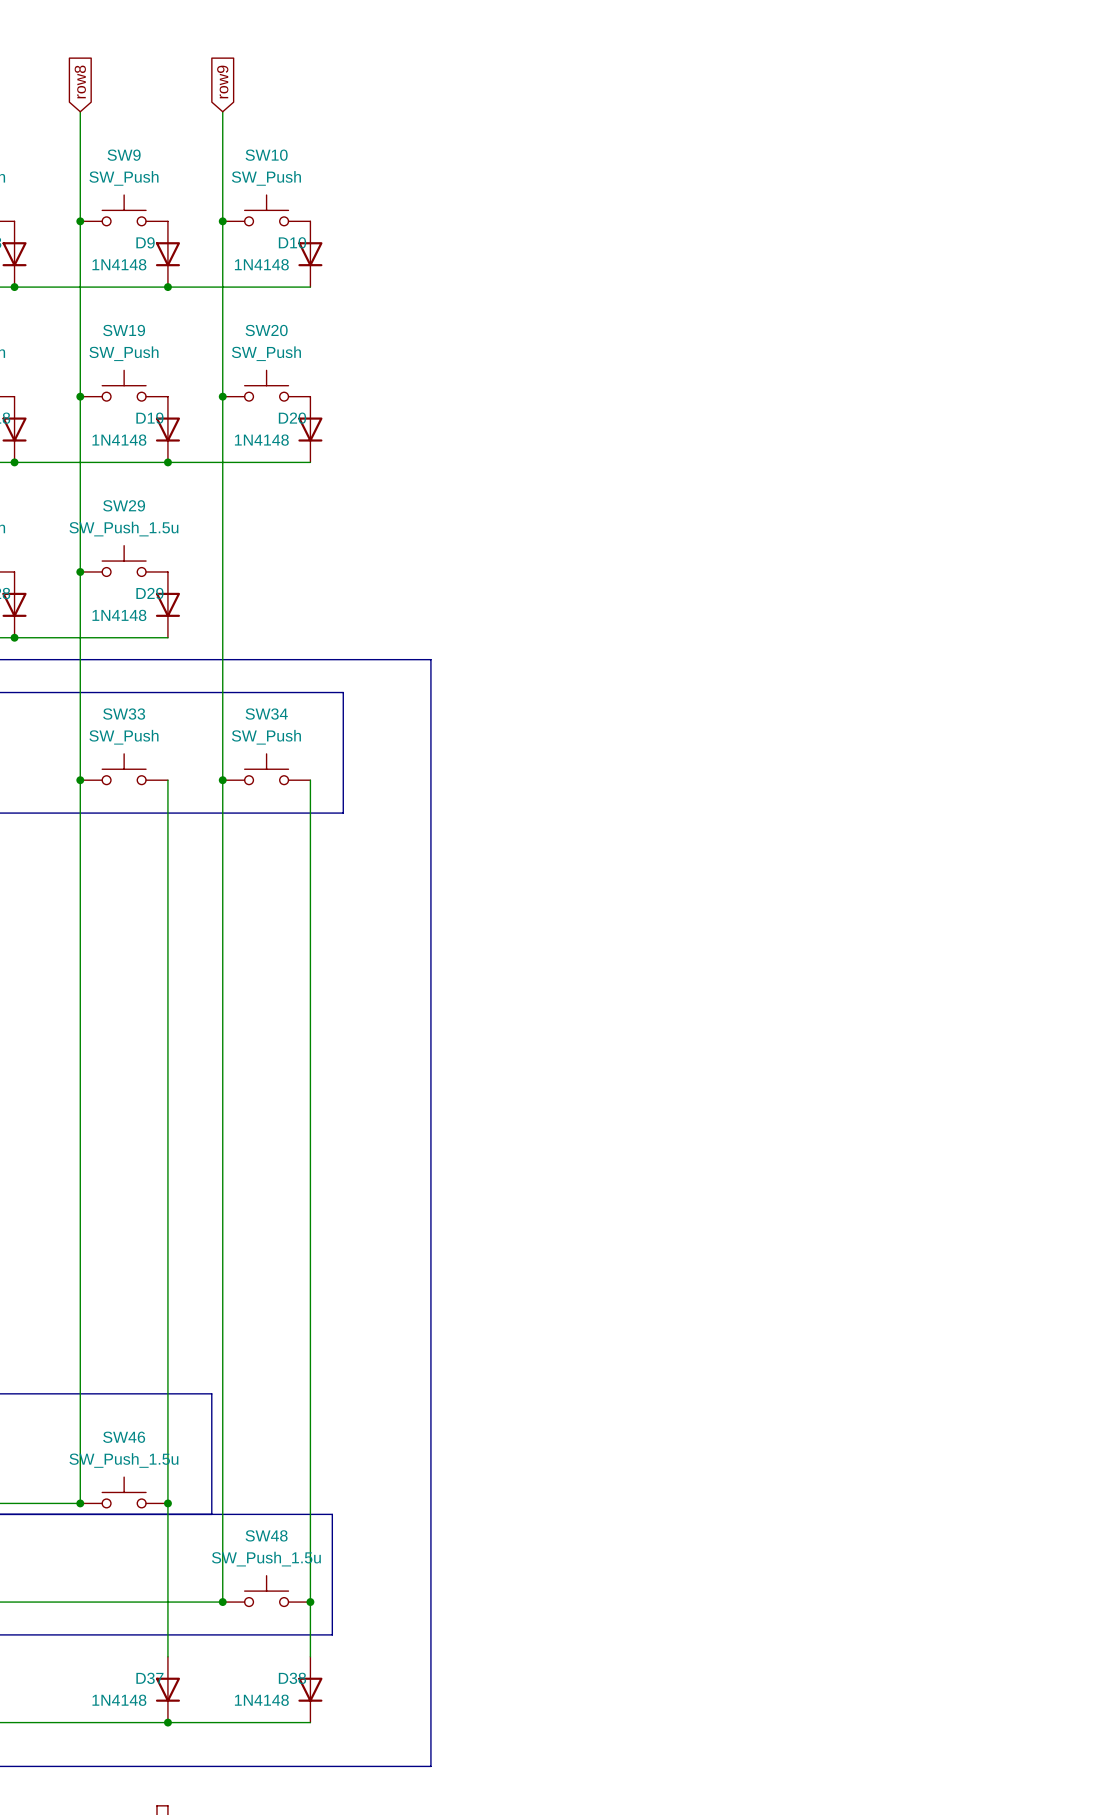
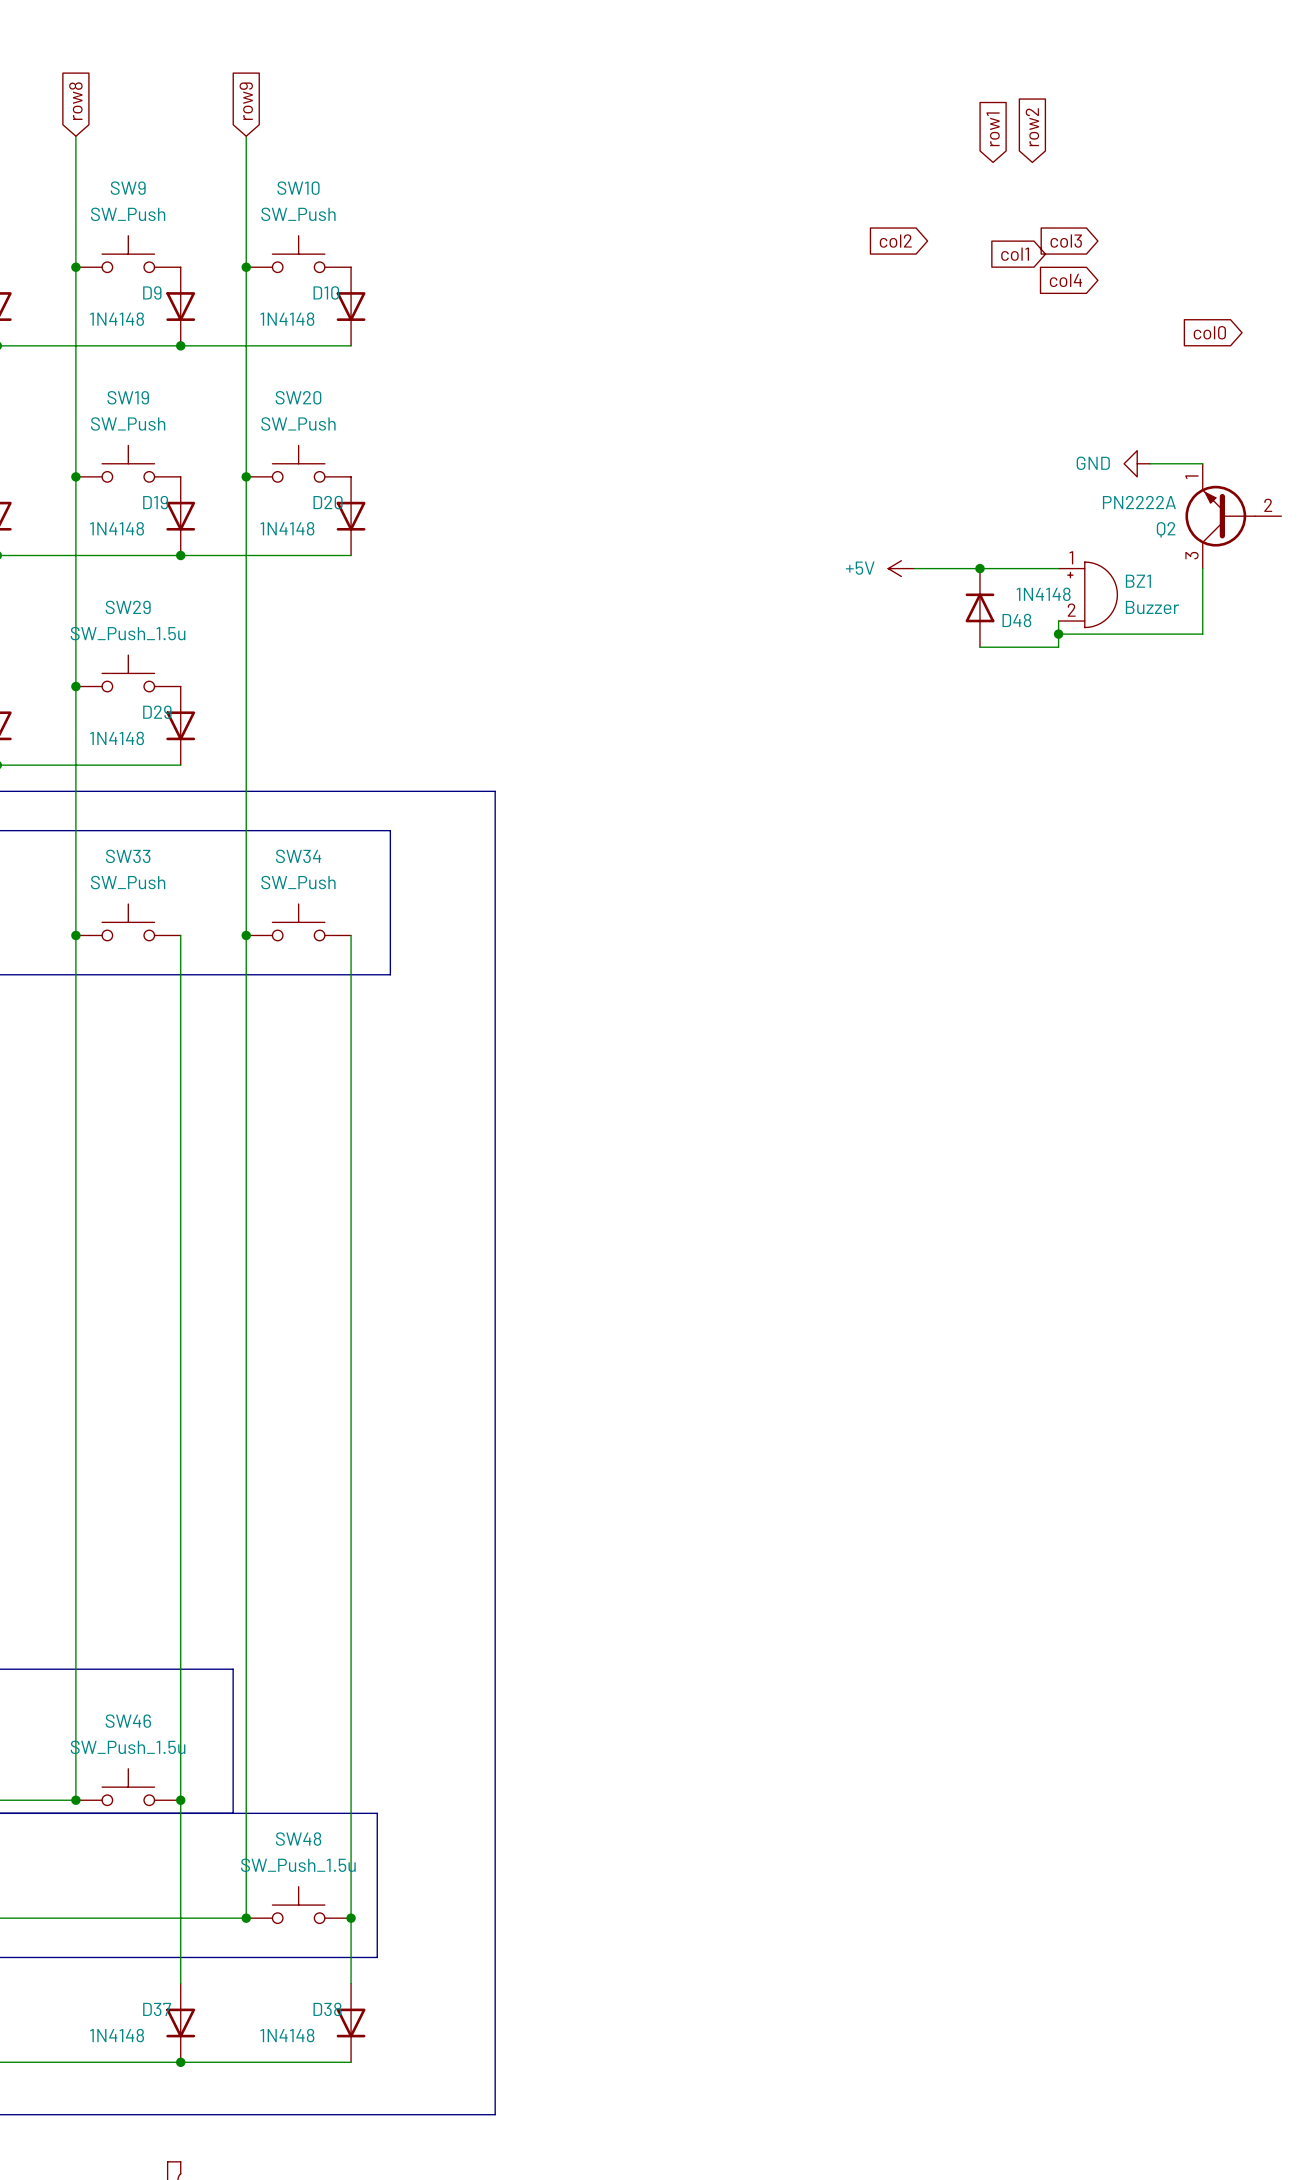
global label: none -> row1 (993, 129)
global label: none -> row2 (1032, 127)
global label: none -> col2 (895, 241)
global label: none -> col3 (1066, 241)
global label: none -> col1 (1015, 254)
global label: none -> col4 (1065, 280)
global label: none -> col0 (1209, 332)
power symbol: none -> GND (1137, 463)
wire: none -> (1150, 463) (1202, 463)
Q2: none -> PN2222A (1233, 516)
power symbol: none -> +5V (901, 568)
wire: none -> (914, 568) (1058, 568)
junction: none -> (979, 568)
wire: none -> (1202, 568) (1202, 634) (1058, 634)
BZ1: none -> Buzzer (1088, 594)
D48: none -> 1N4148 (979, 607)
wire: none -> (1058, 621) (1058, 647) (979, 647)
junction: none -> (1058, 634)

